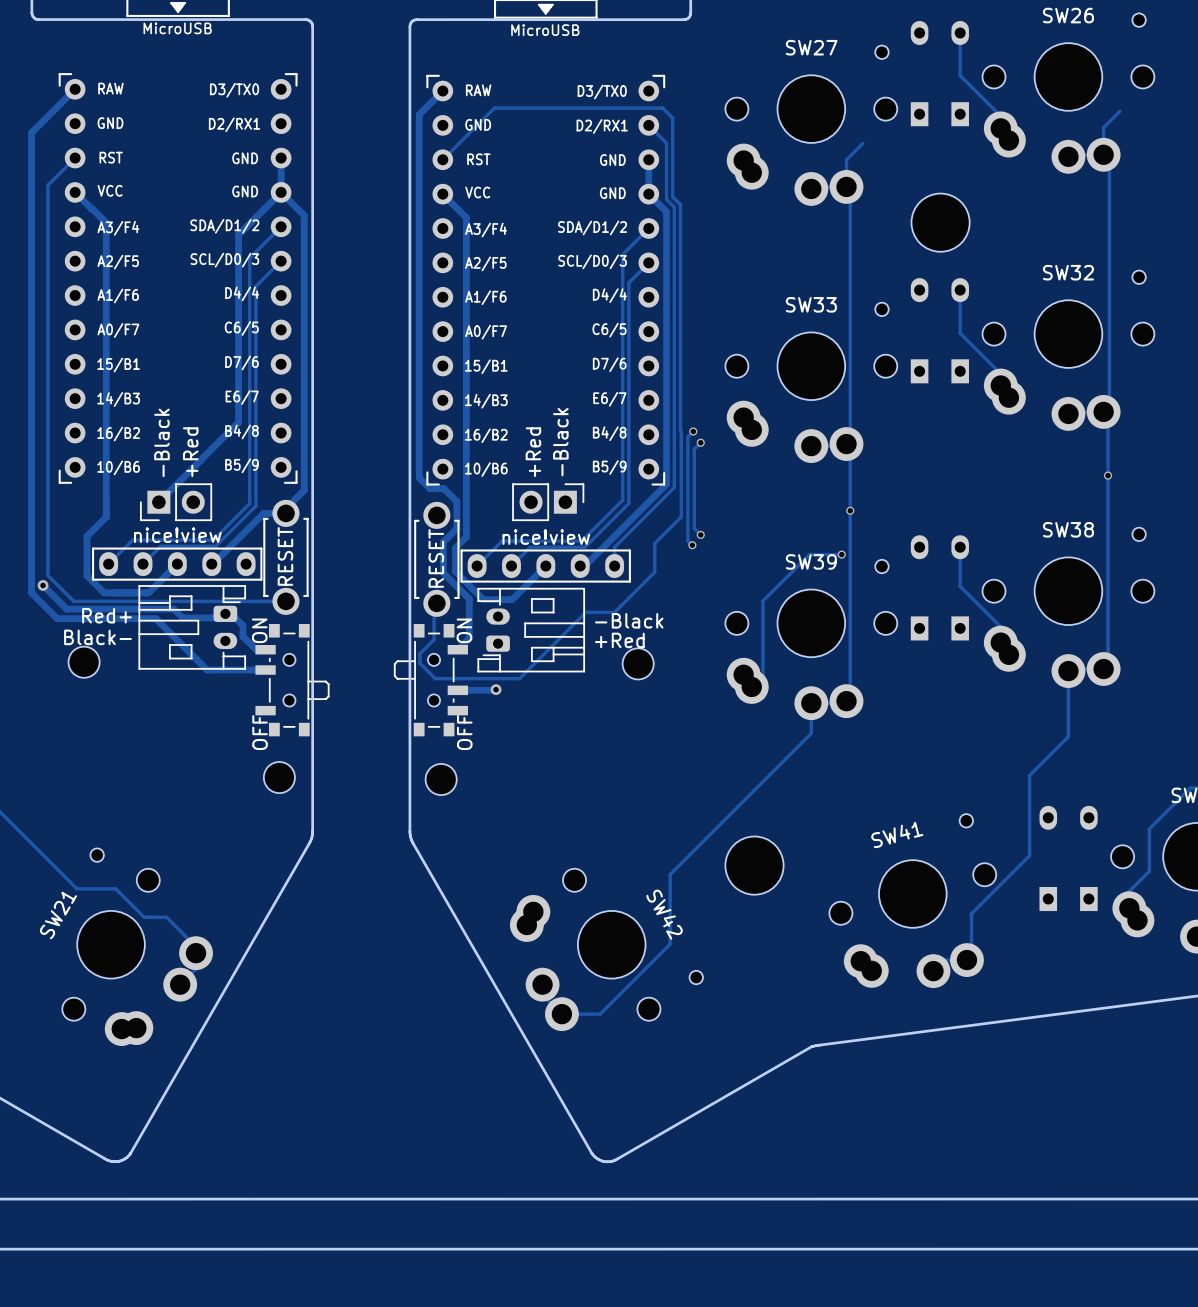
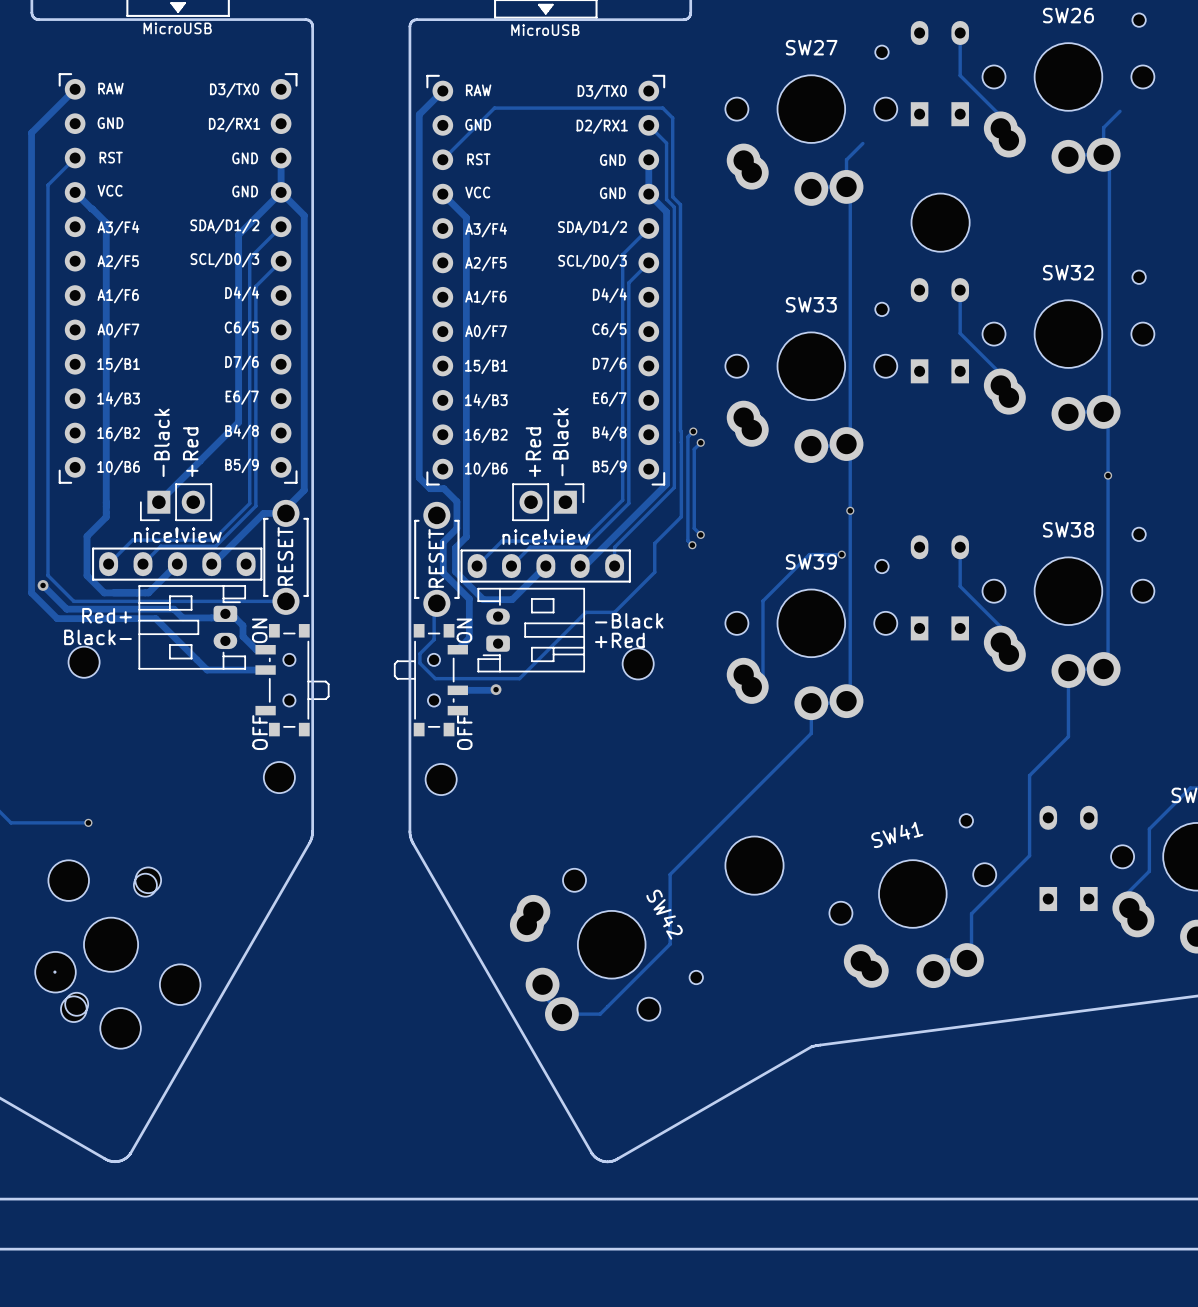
track: (10, 822) (76, 888) (115, 888) (144, 917) (166, 917) (196, 946) (196, 968) (180, 984) -> (10, 822) (88, 822)
via: none -> (88, 822)
SW21: (137, 947) -> none
part: none -> (117, 954)

